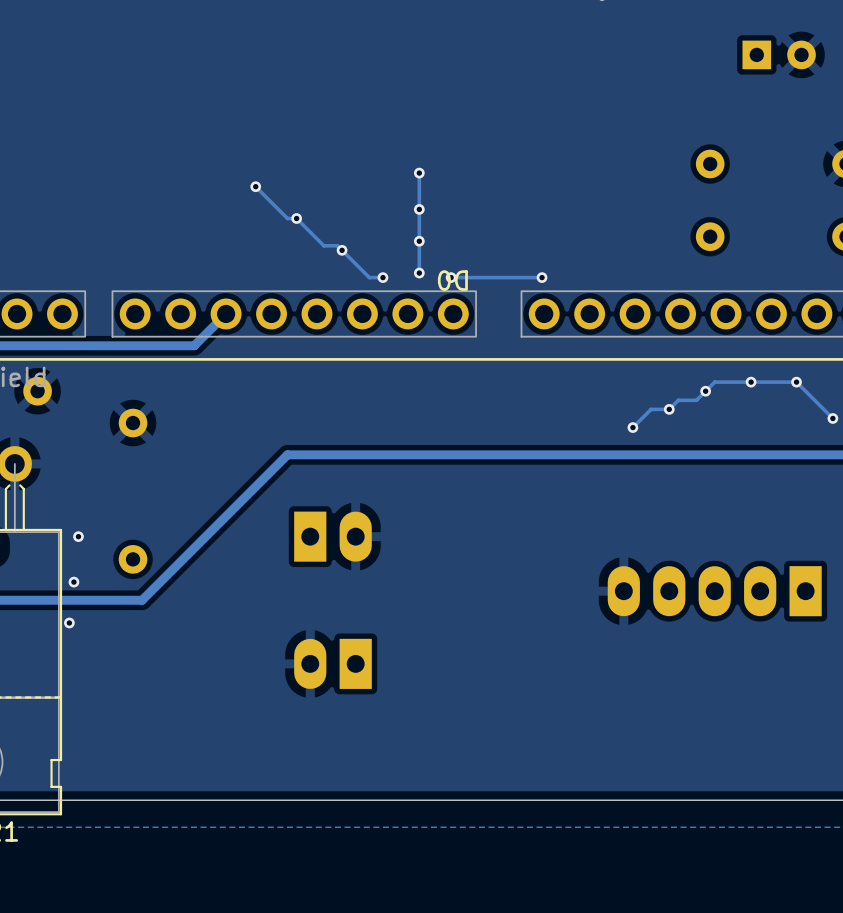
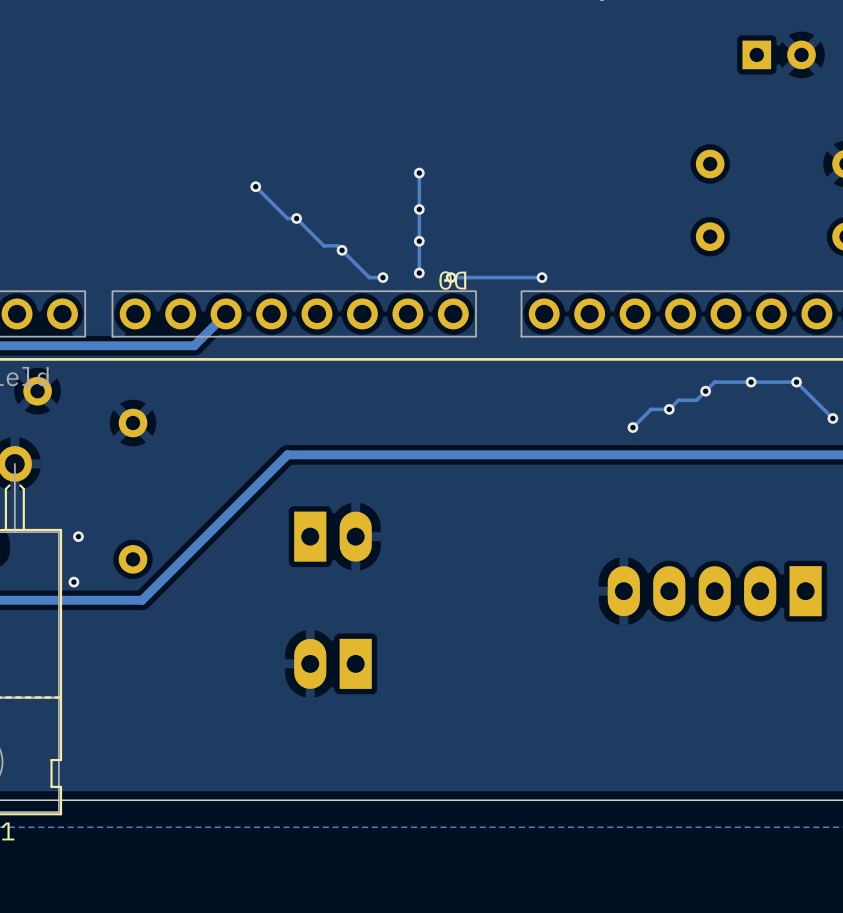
via: (69, 622) -> none

